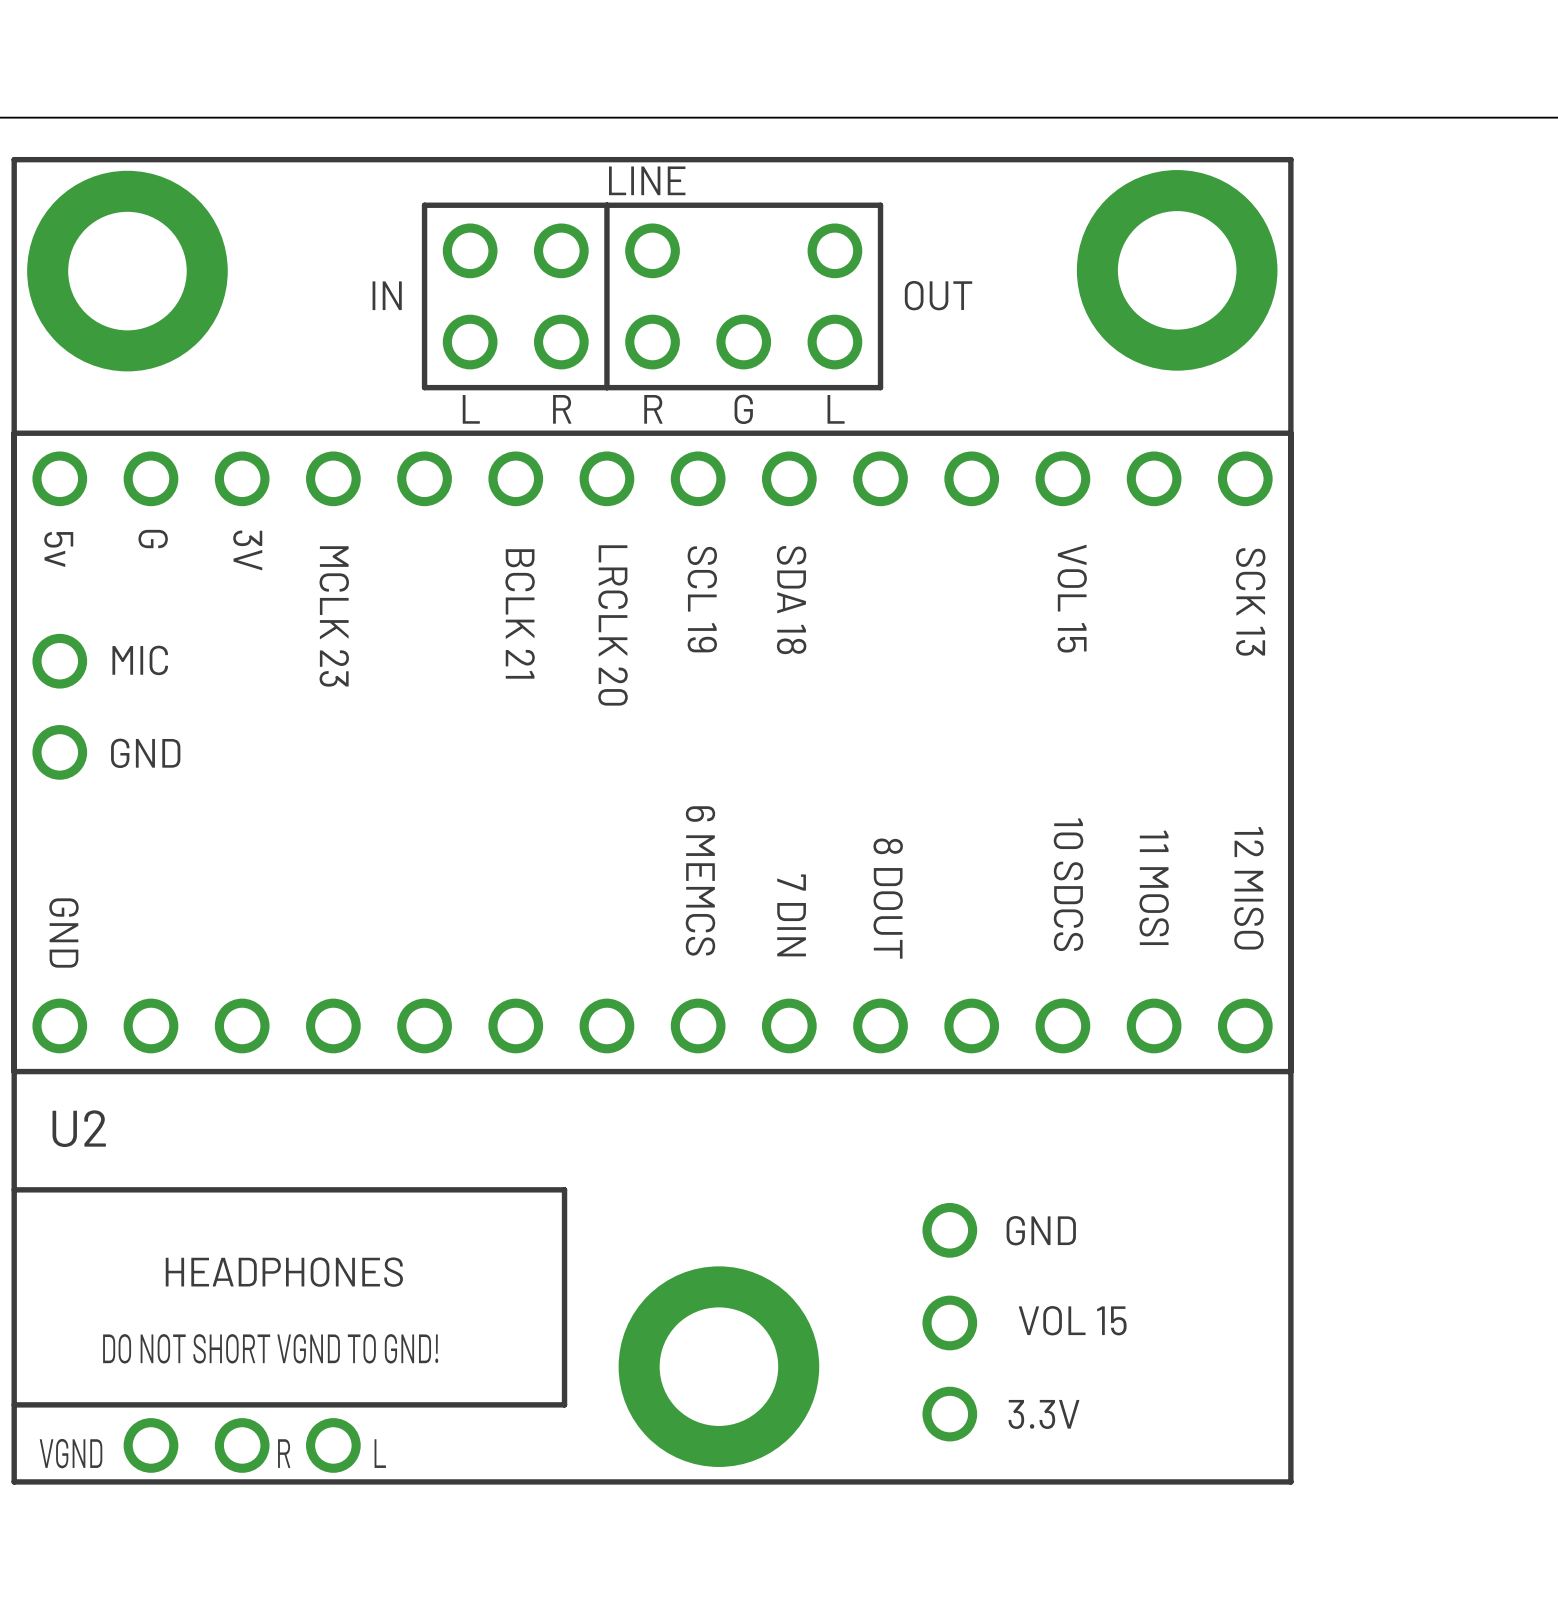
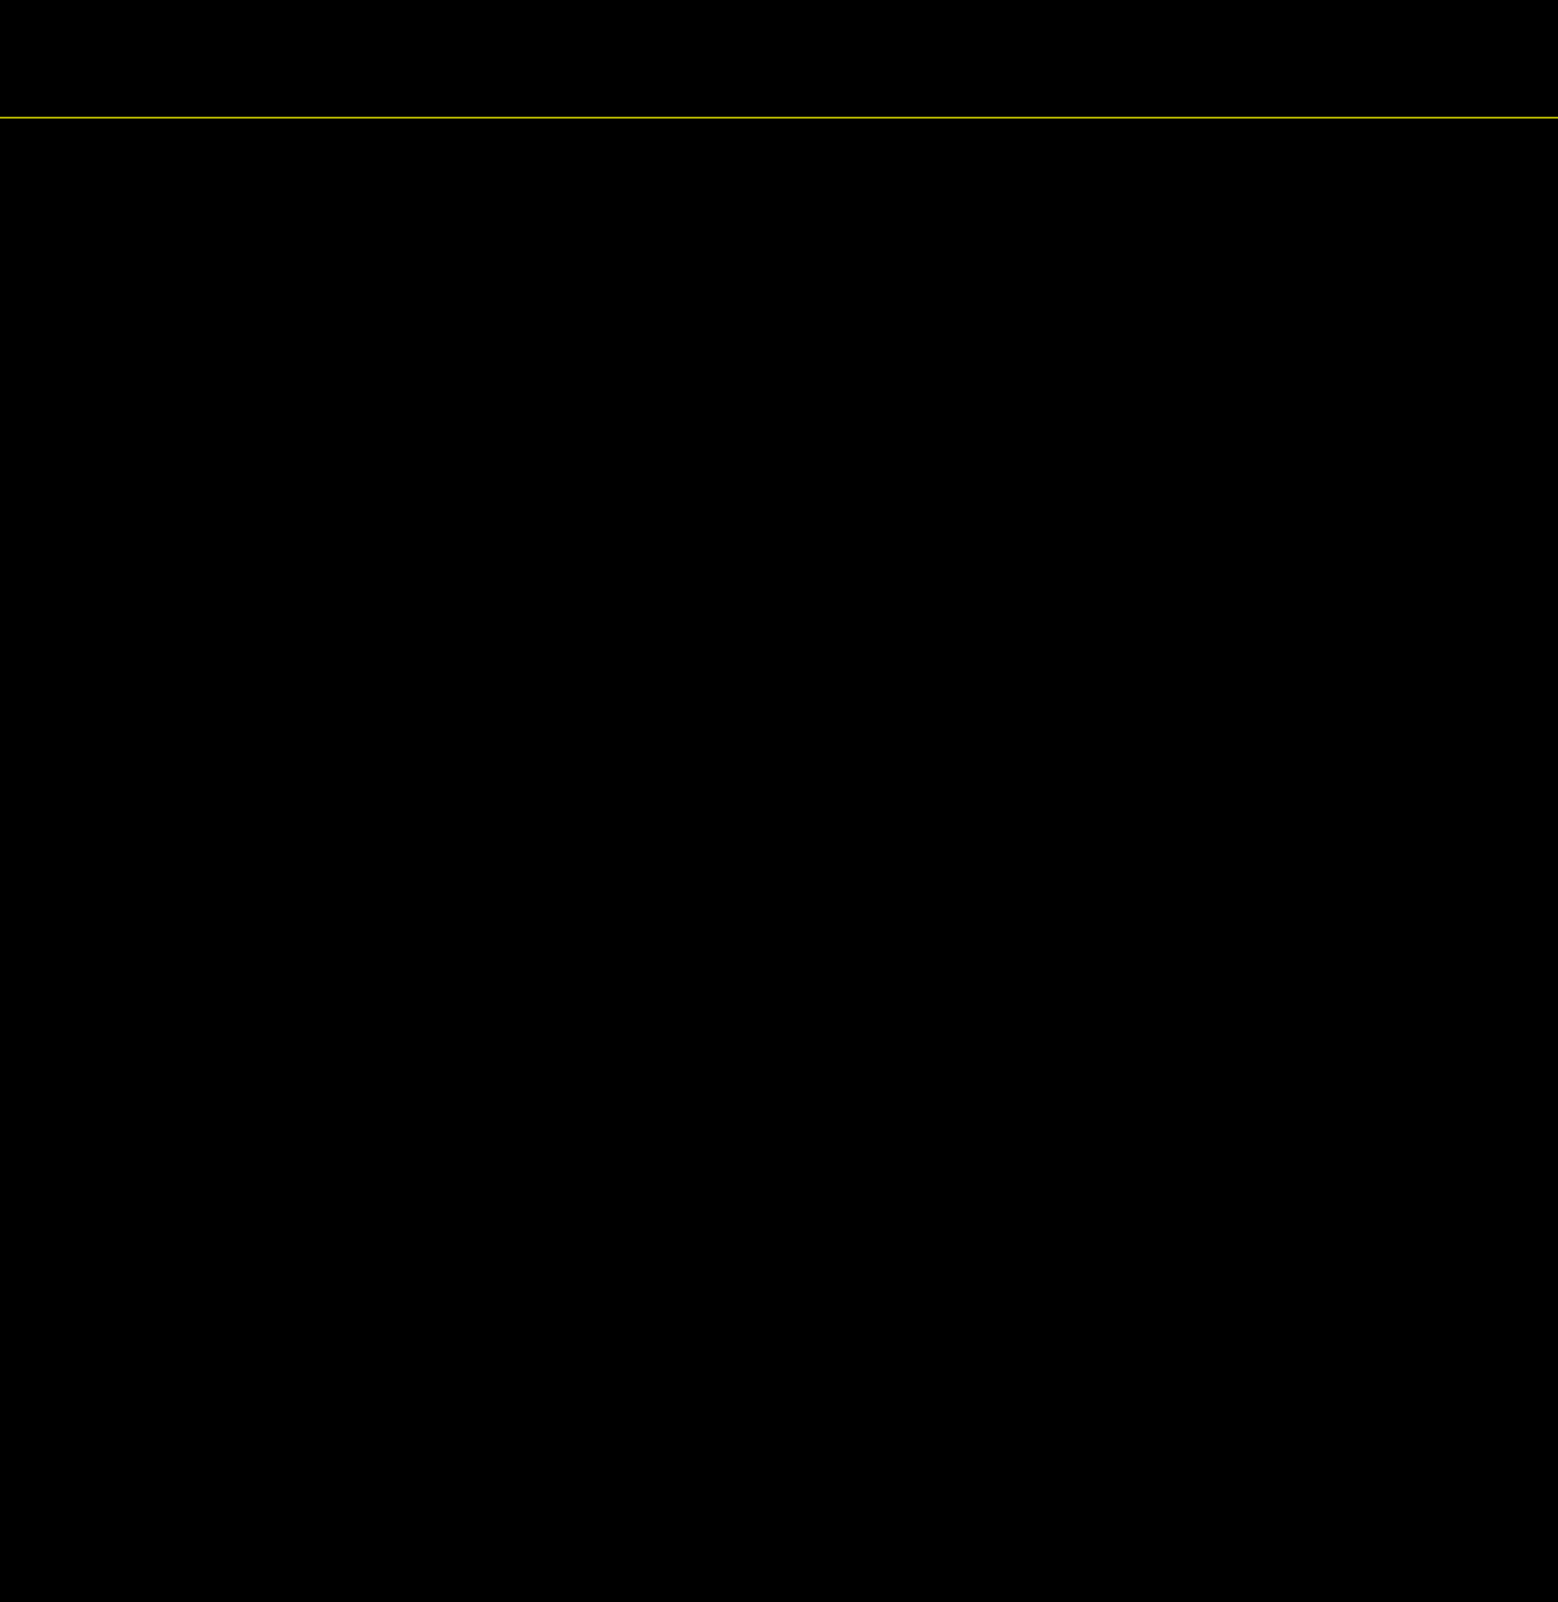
U2: (652, 820) -> none

